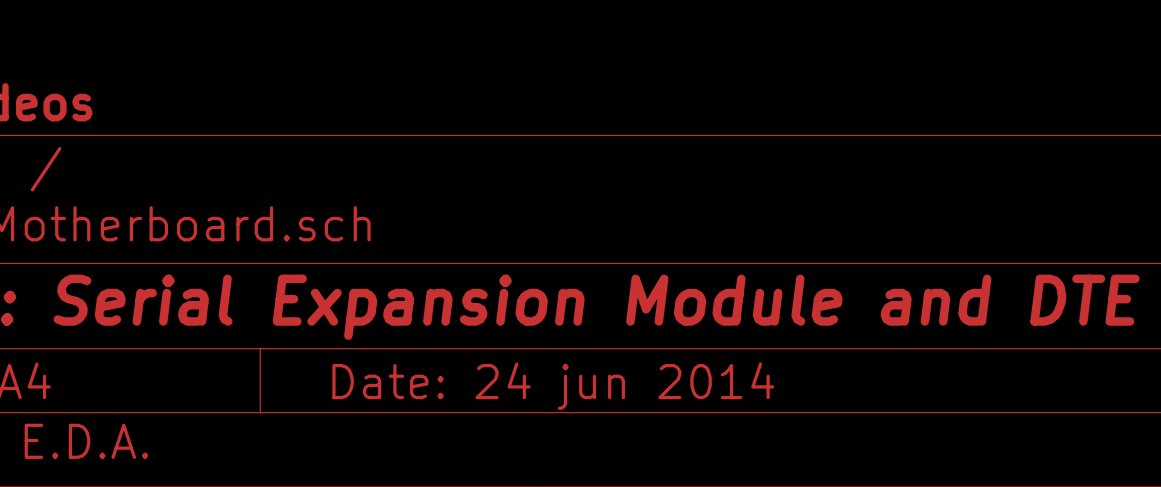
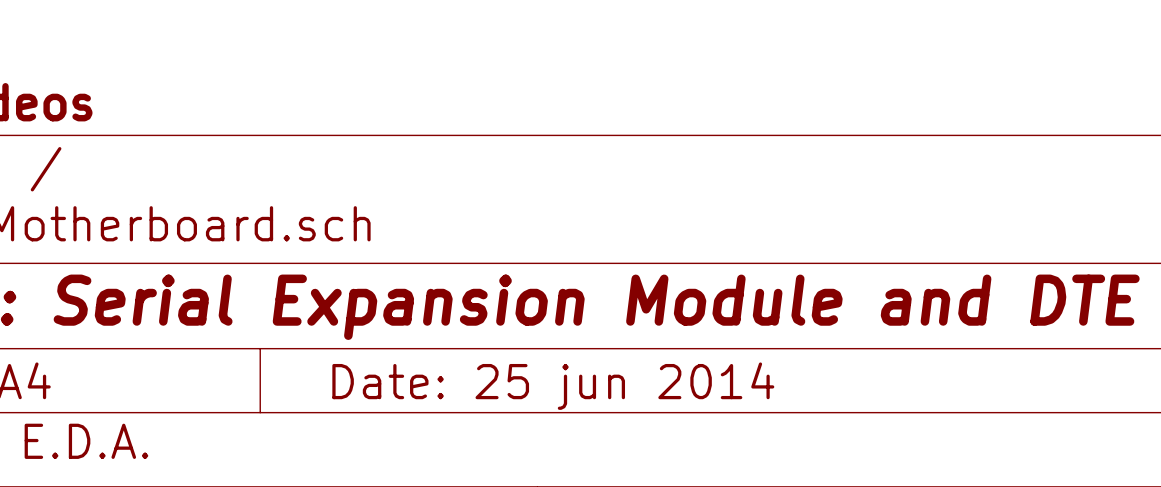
title block: Date: 24 jun 2014 (553, 386) -> Date: 25 jun 2014 (553, 386)

